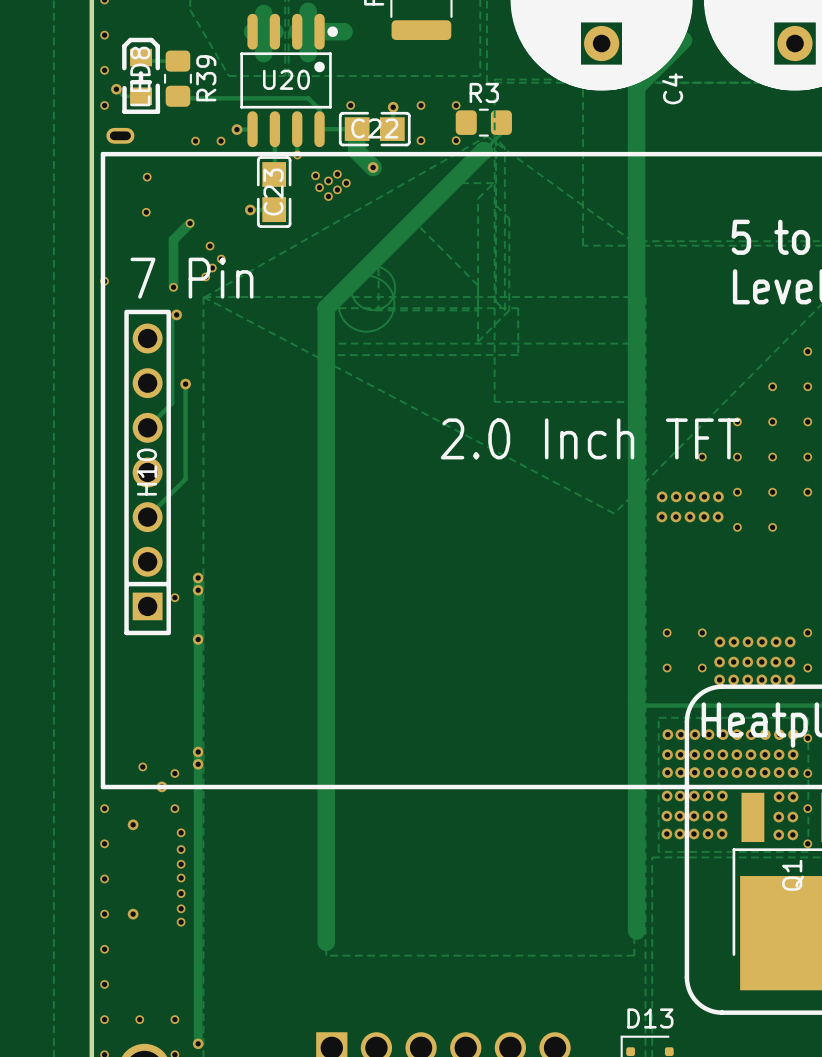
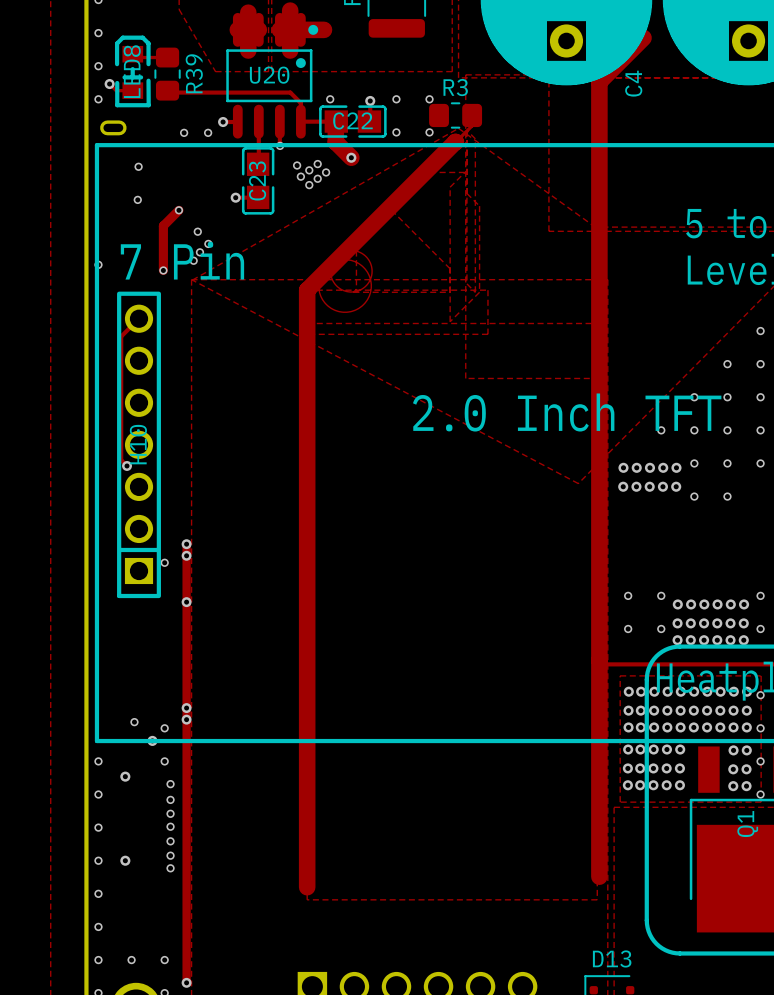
track: (176, 314) (172, 319) (172, 403) (147, 427) -> none
via: (176, 314) -> none
track: none -> (139, 318) (121, 336) (121, 460) (127, 465)
track: (185, 384) (185, 479) (147, 517) -> none
via: (185, 384) -> none
via: none -> (127, 465)

